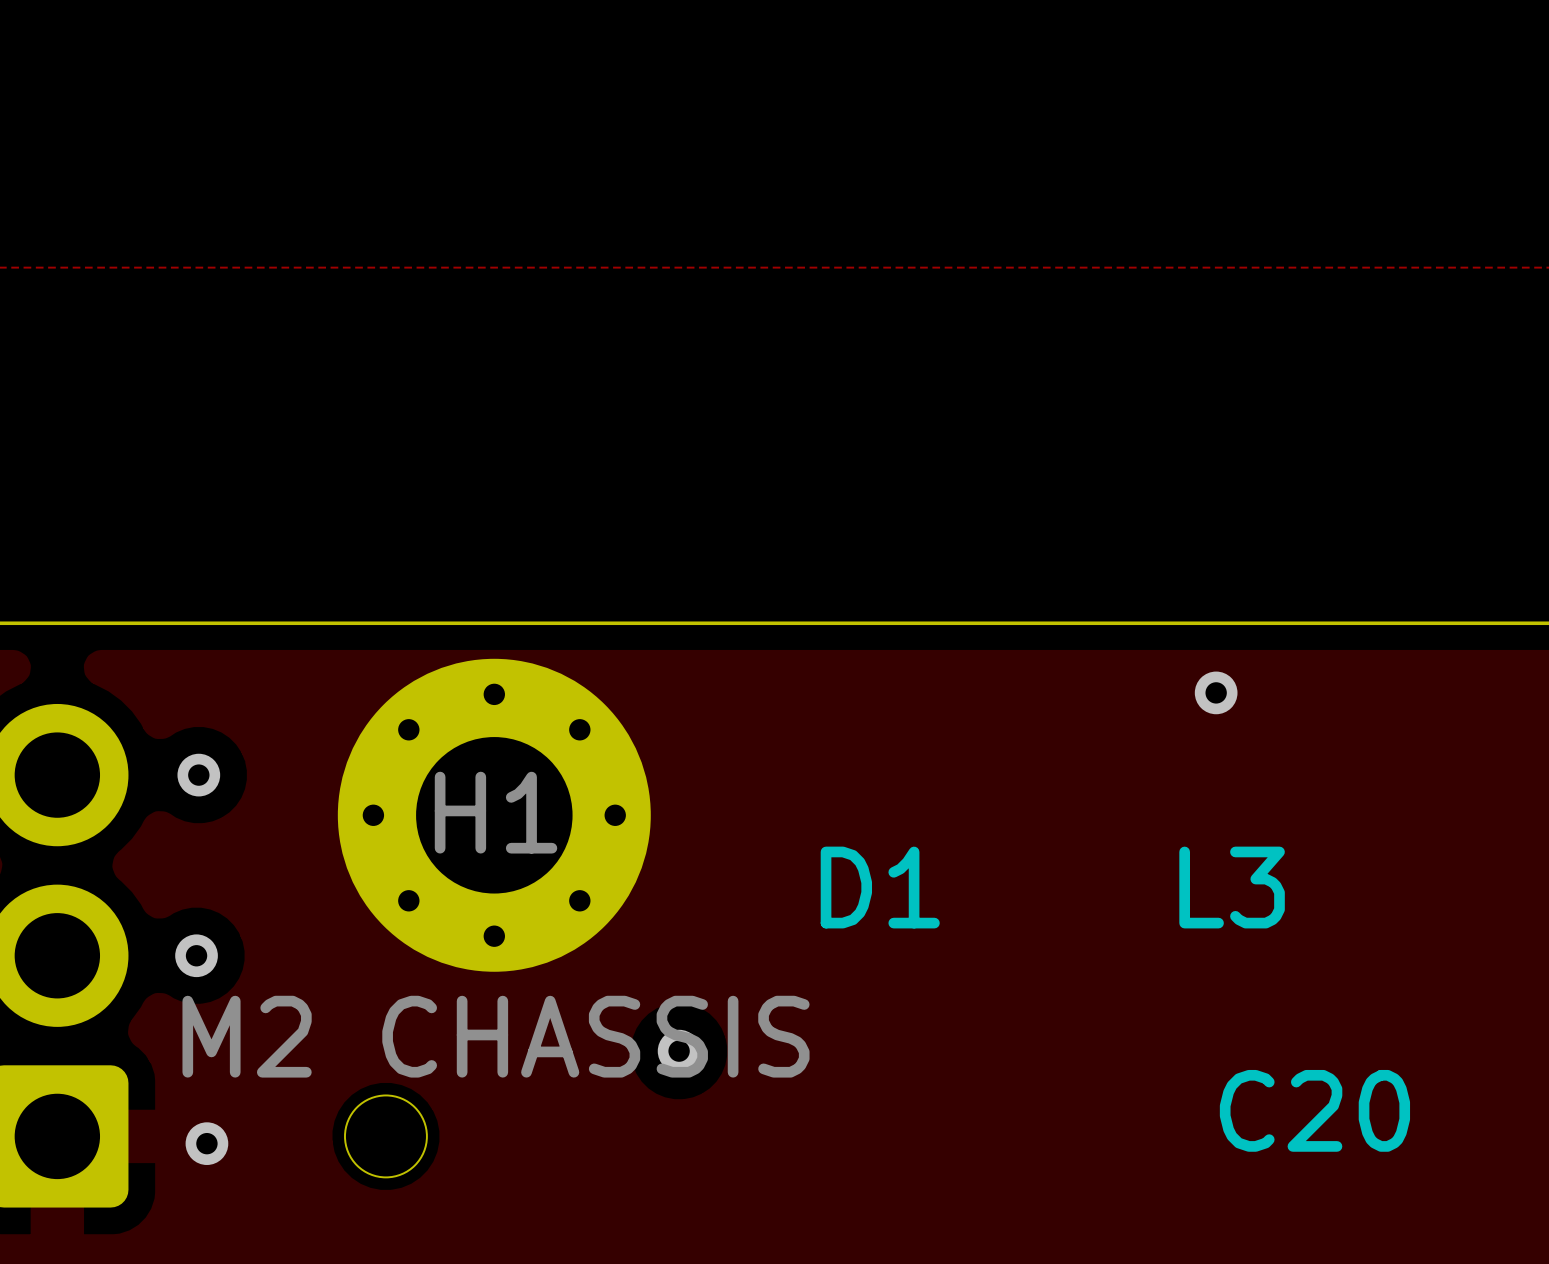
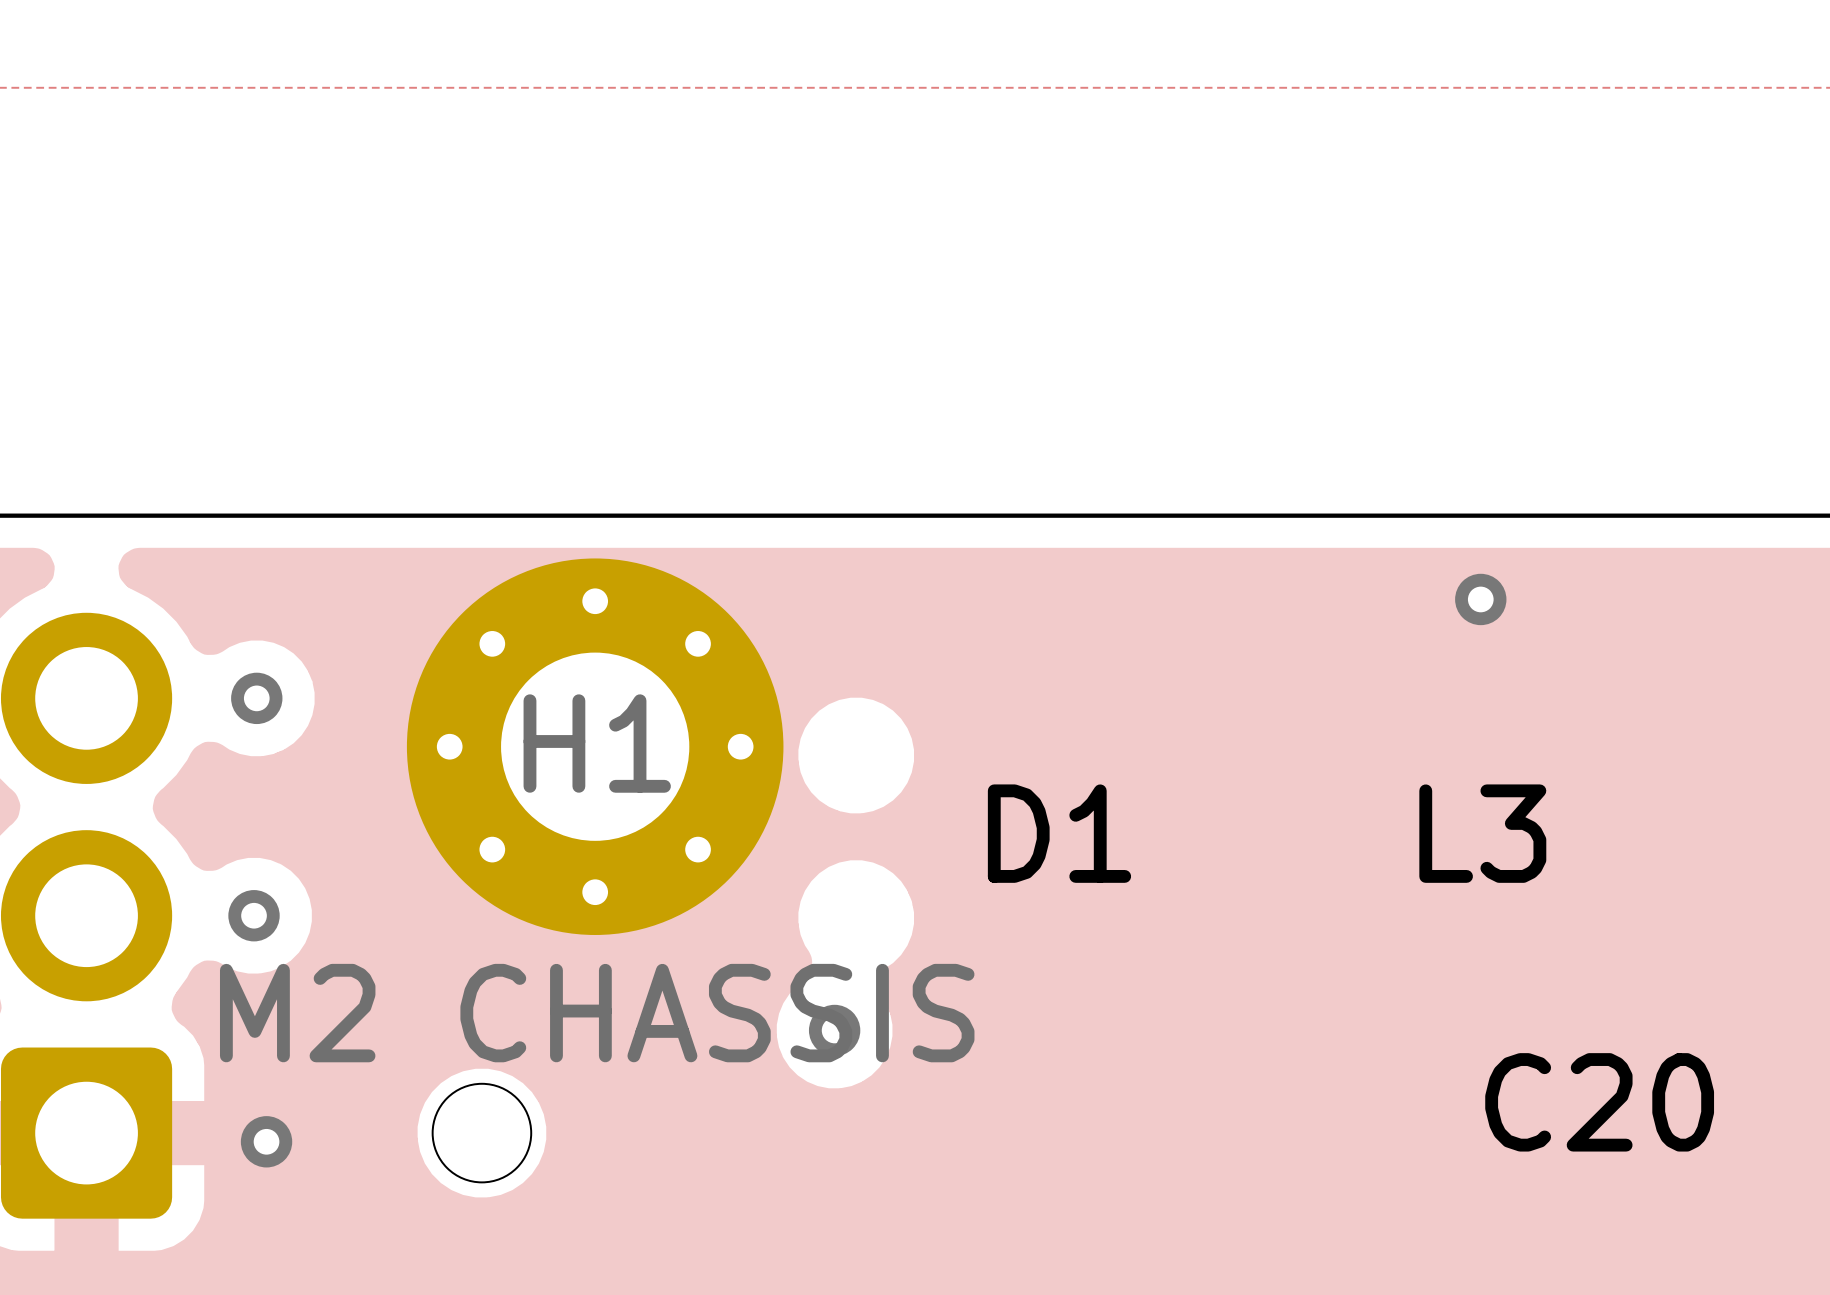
H1 position: (494, 815) -> (595, 746)
D1 position: (880, 887) -> (1059, 833)
L3 position: (1232, 887) -> (1482, 833)

